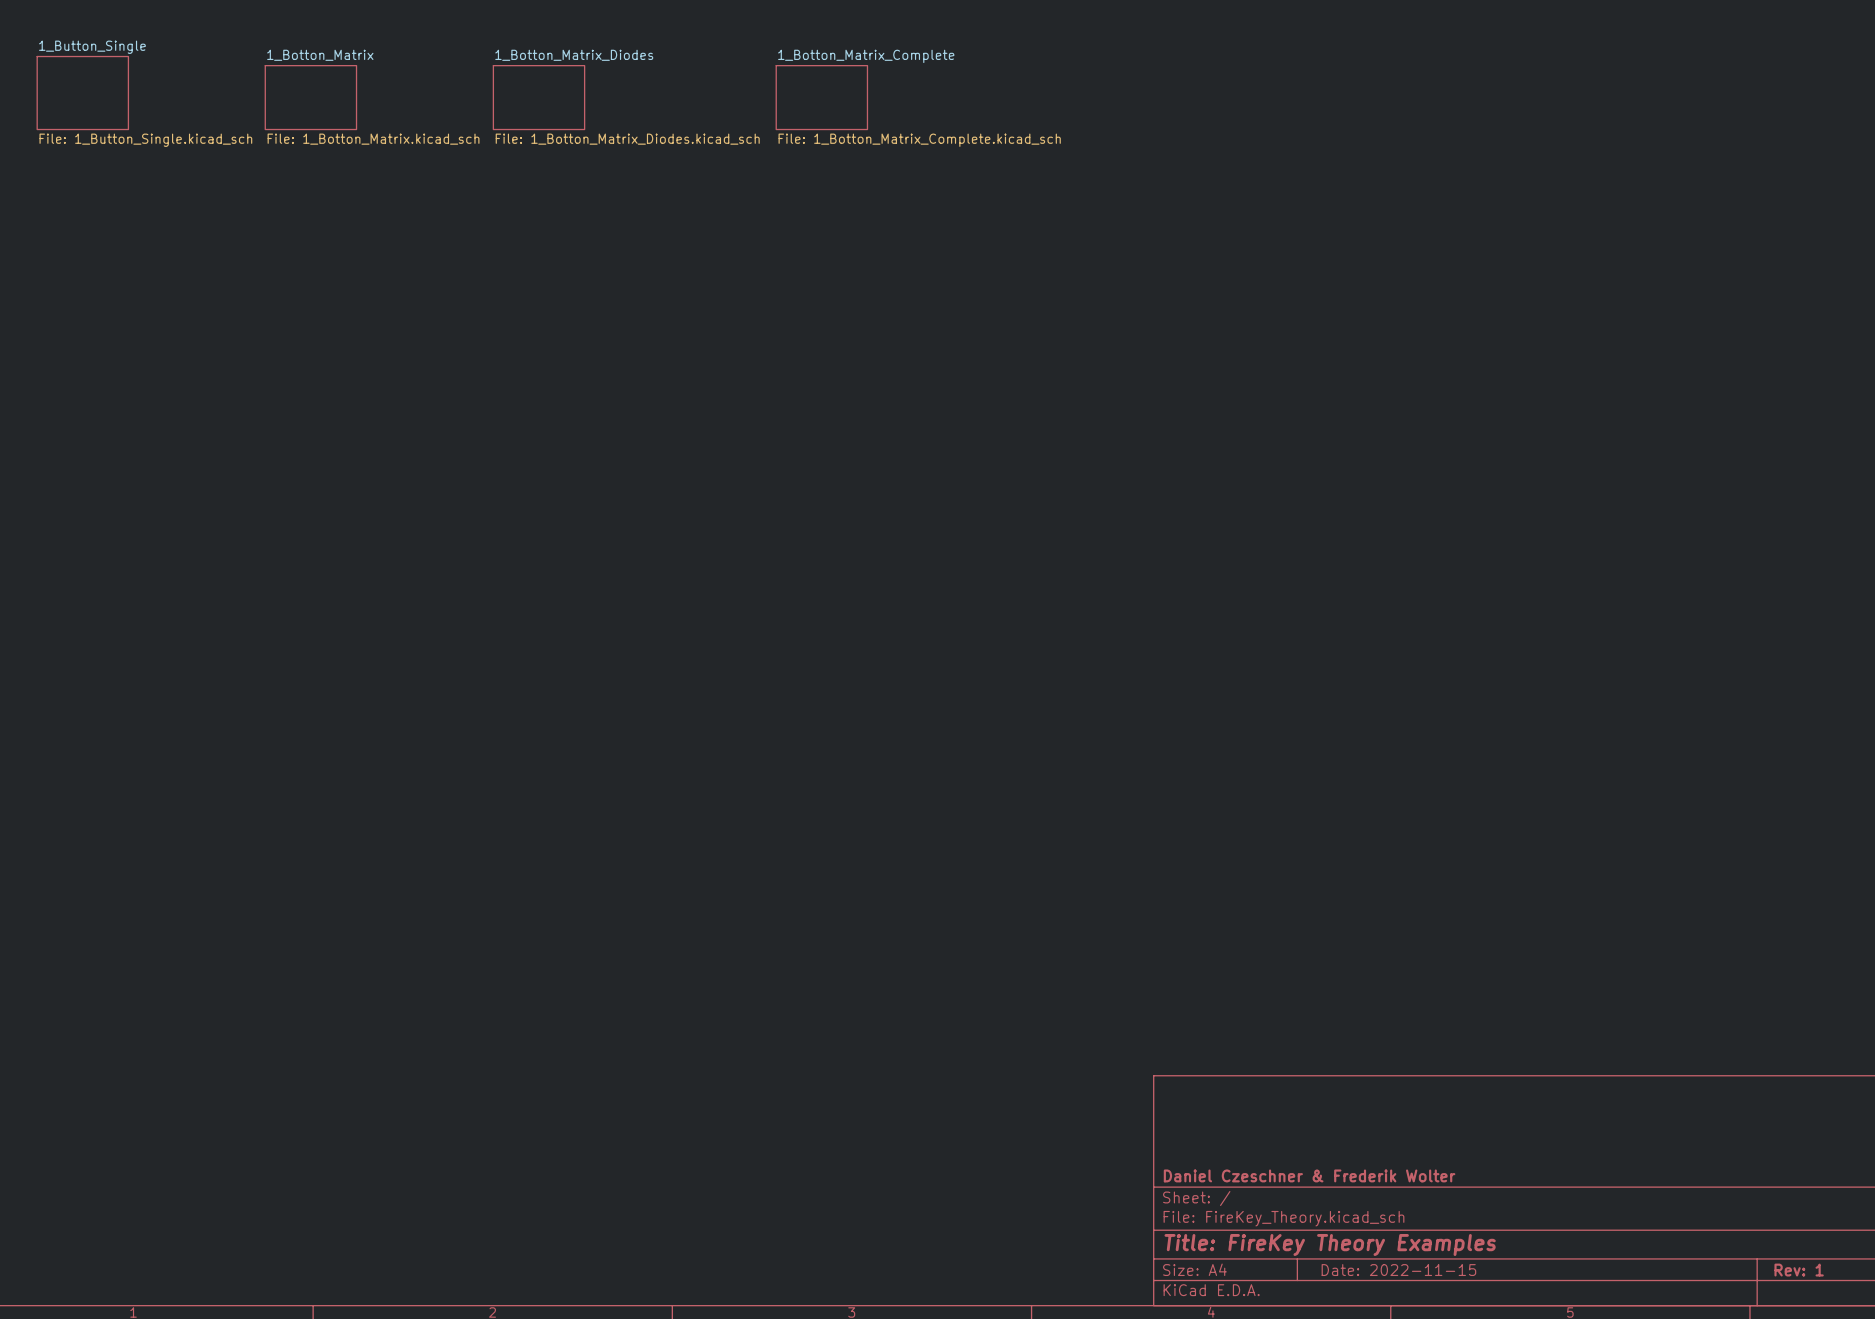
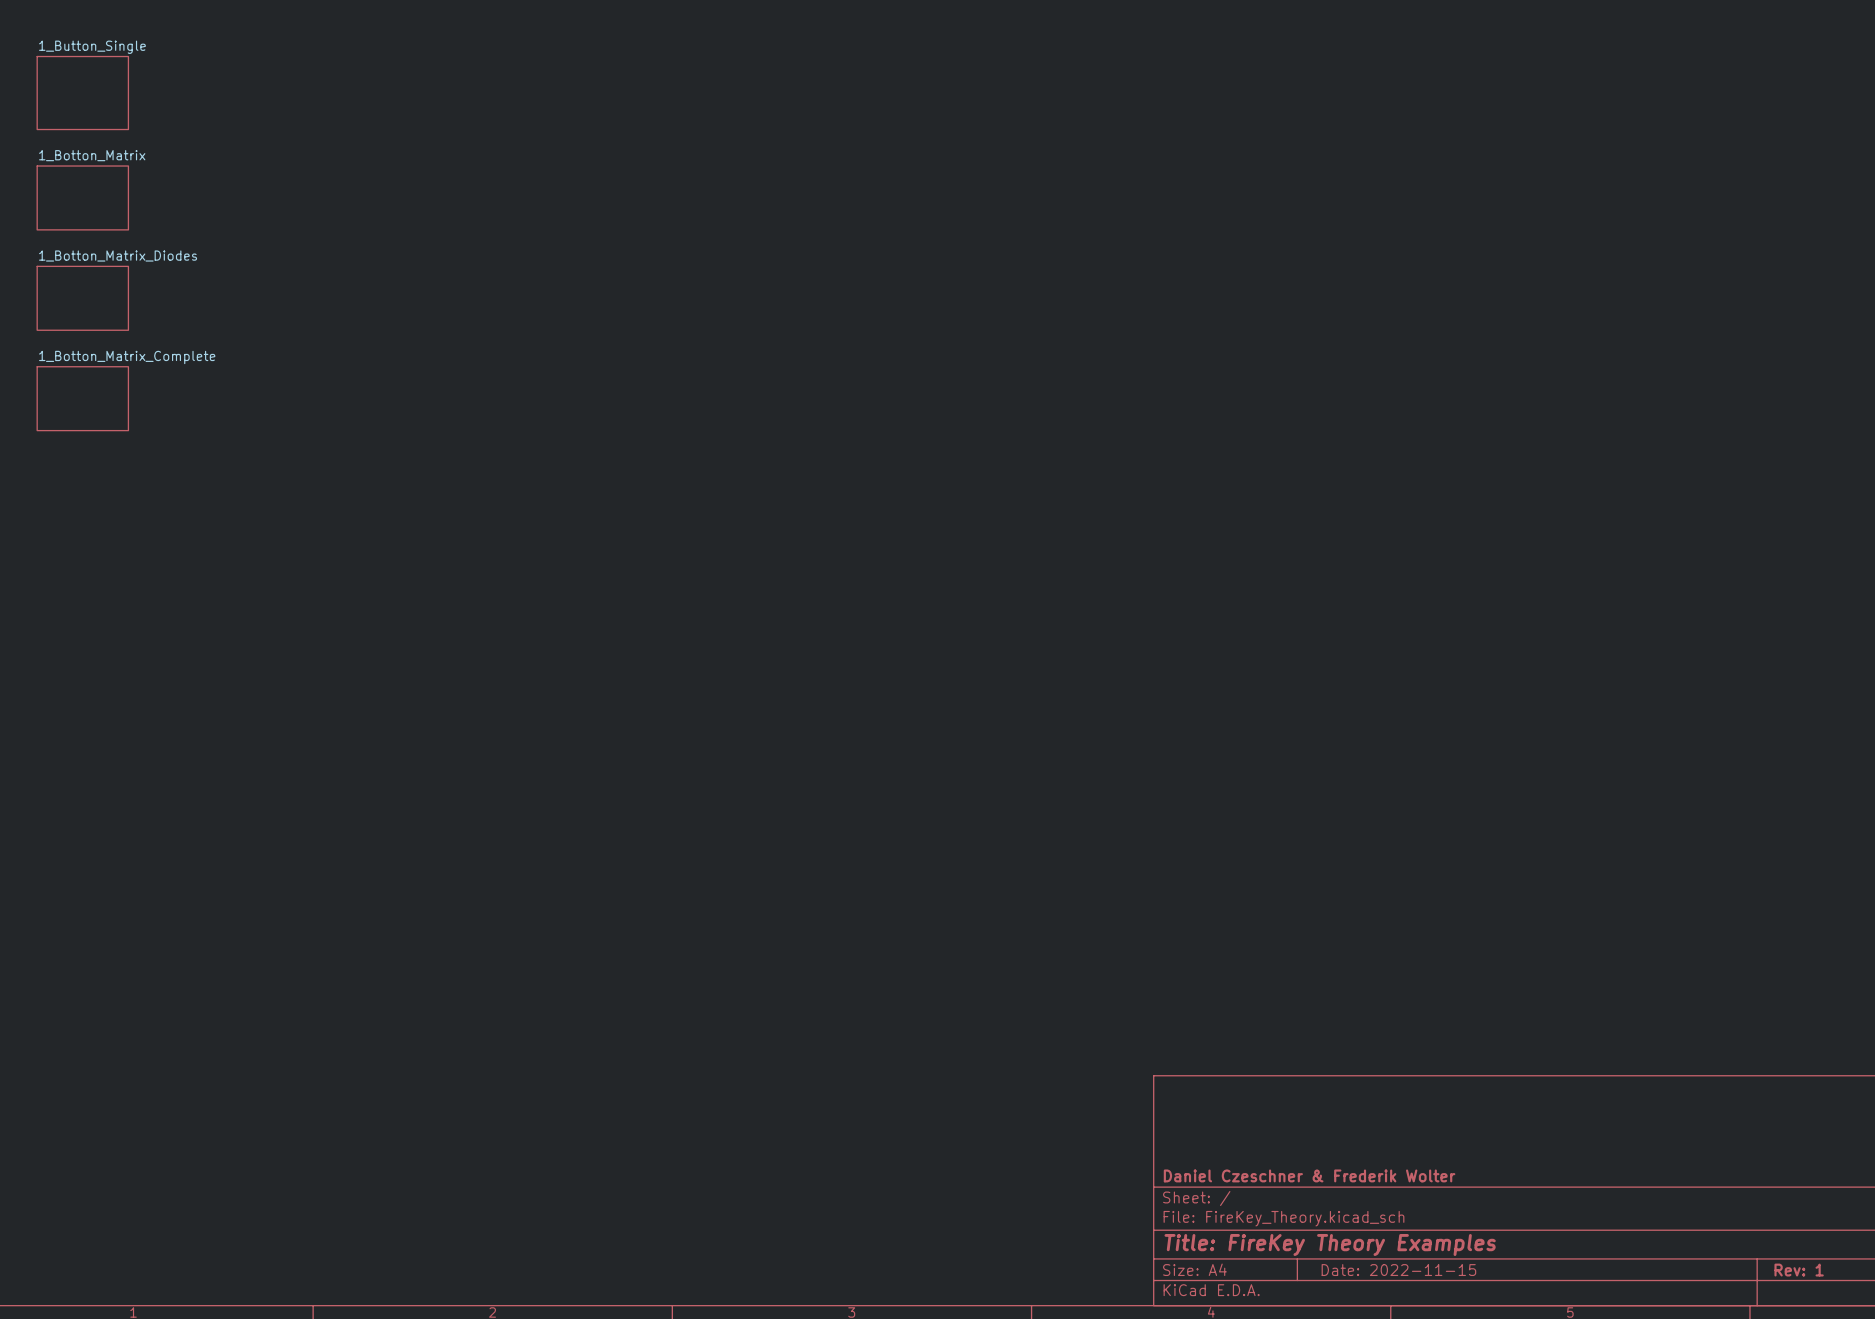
sheet 1_Botton_Matrix position: (310, 97) -> (82, 197)
sheet 1_Botton_Matrix_Diodes position: (539, 97) -> (82, 298)
sheet 1_Botton_Matrix_Complete position: (821, 97) -> (82, 398)
sheet 1_Botton_Matrix value: File: 1_Botton_Matrix.kicad_sch (373, 139) -> none
sheet 1_Botton_Matrix_Diodes value: File: 1_Botton_Matrix_Diodes.kicad_sch (627, 139) -> none
sheet 1_Button_Single value: File: 1_Button_Single.kicad_sch (145, 140) -> none
sheet 1_Botton_Matrix_Complete value: File: 1_Botton_Matrix_Complete.kicad_sch (919, 140) -> none

